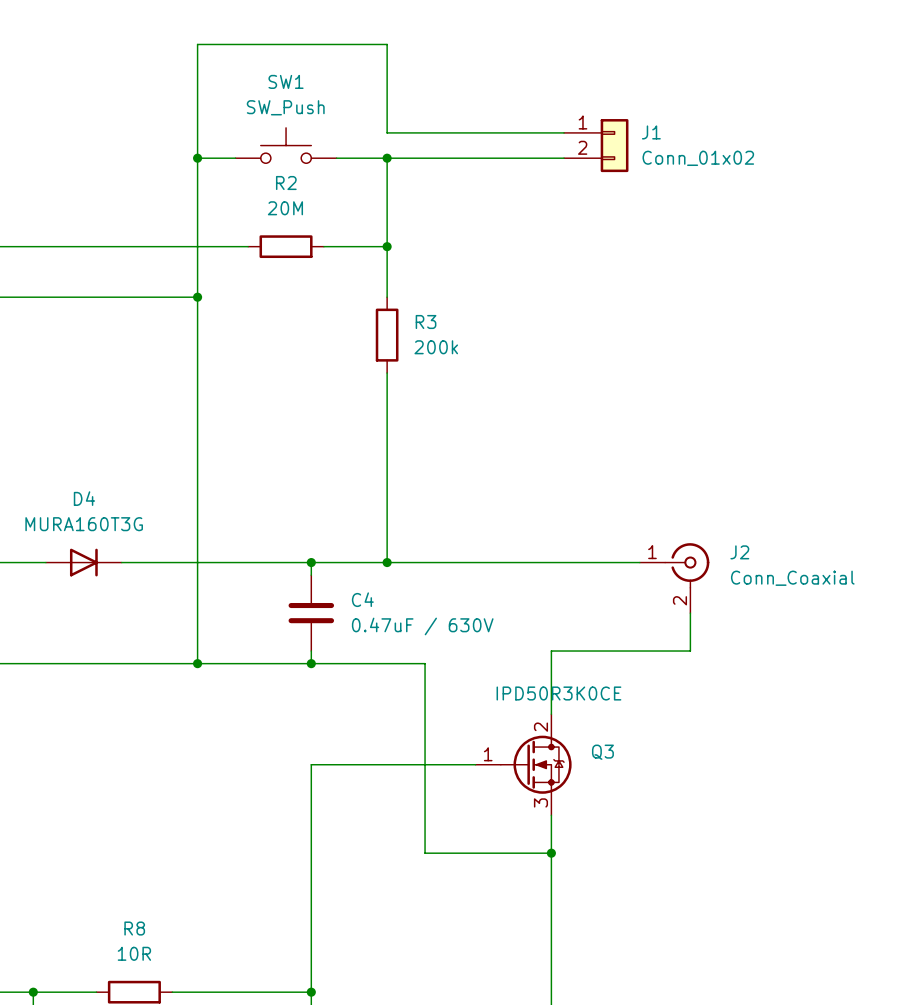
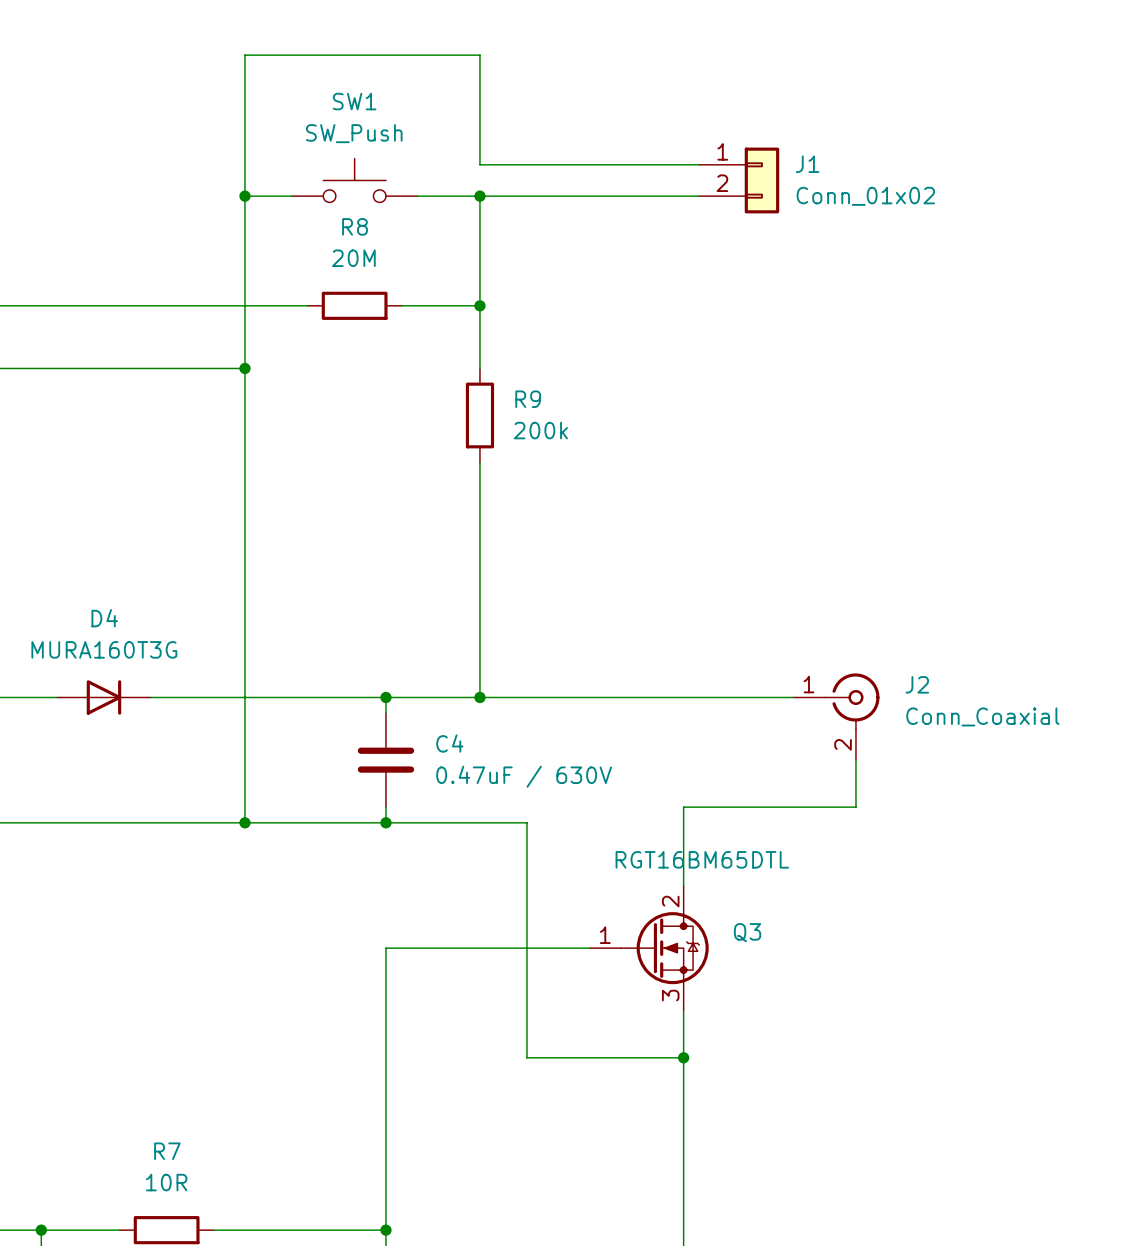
R2 name: R2 (286, 183) -> R8 (355, 226)
R3 name: R3 (426, 322) -> R9 (528, 399)
Q3 value: IPD50R3K0CE (558, 693) -> RGT16BM65DTL (702, 859)
R8 name: R8 (134, 928) -> R7 (167, 1151)

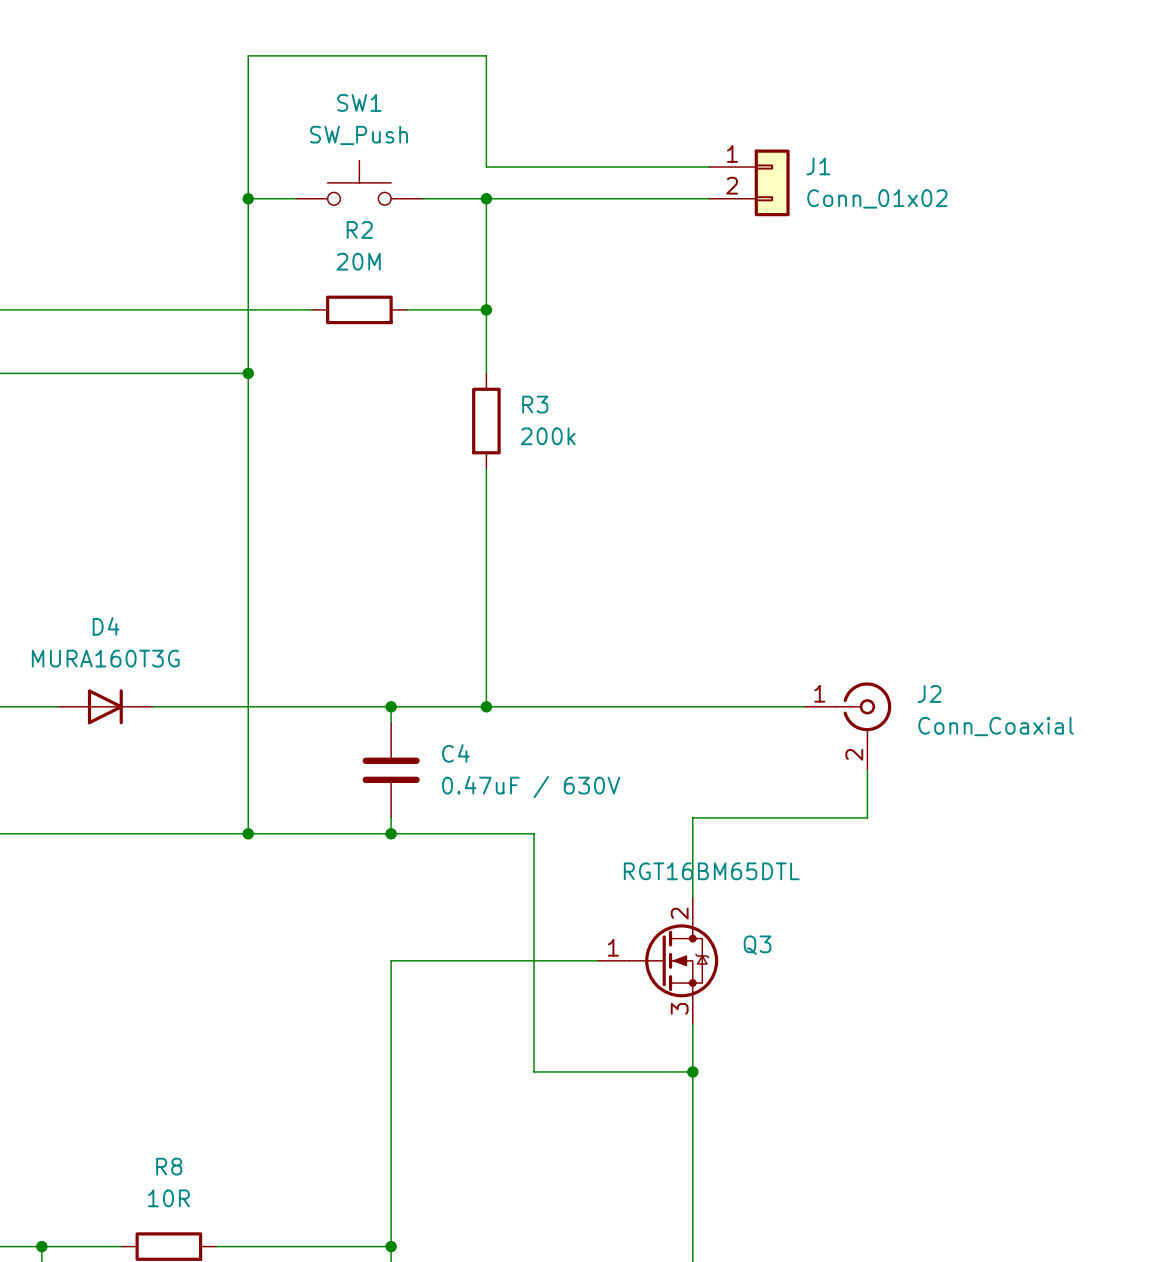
R8 name: R8 (355, 226) -> R2 (359, 229)
R9 name: R9 (528, 399) -> R3 (535, 404)
R7 name: R7 (167, 1151) -> R8 (169, 1166)

